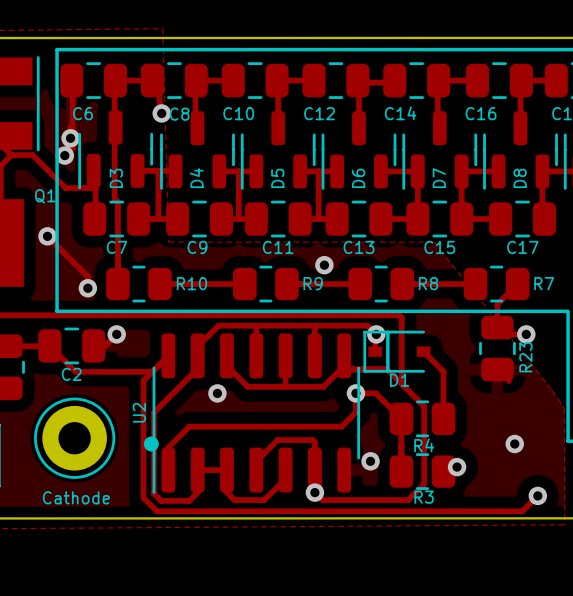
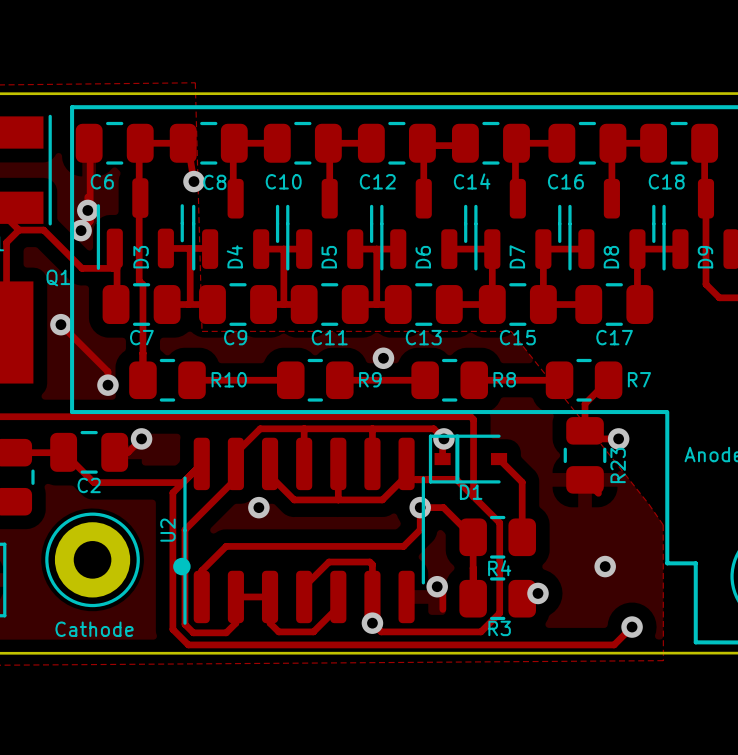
track: none -> (442, 592) (442, 609)

